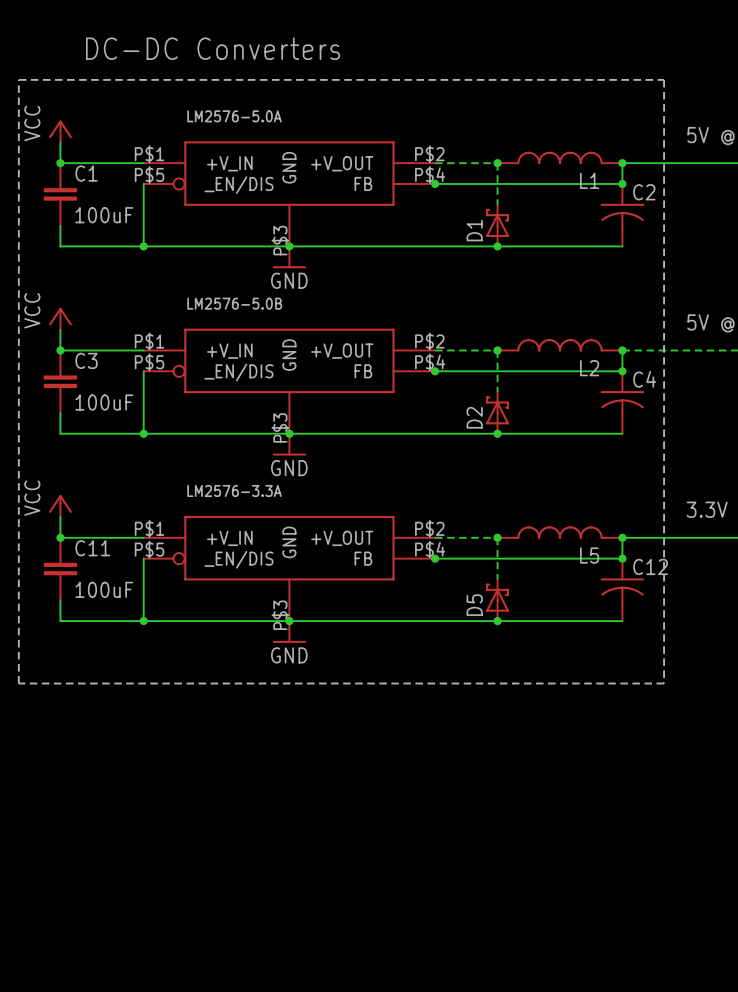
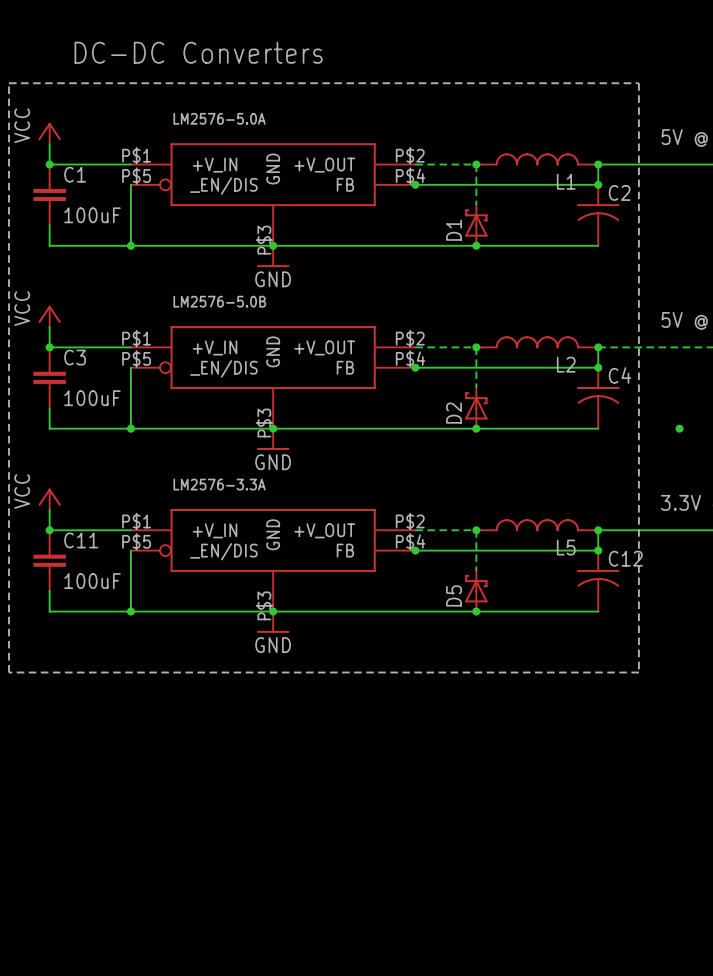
junction: none -> (679, 428)

